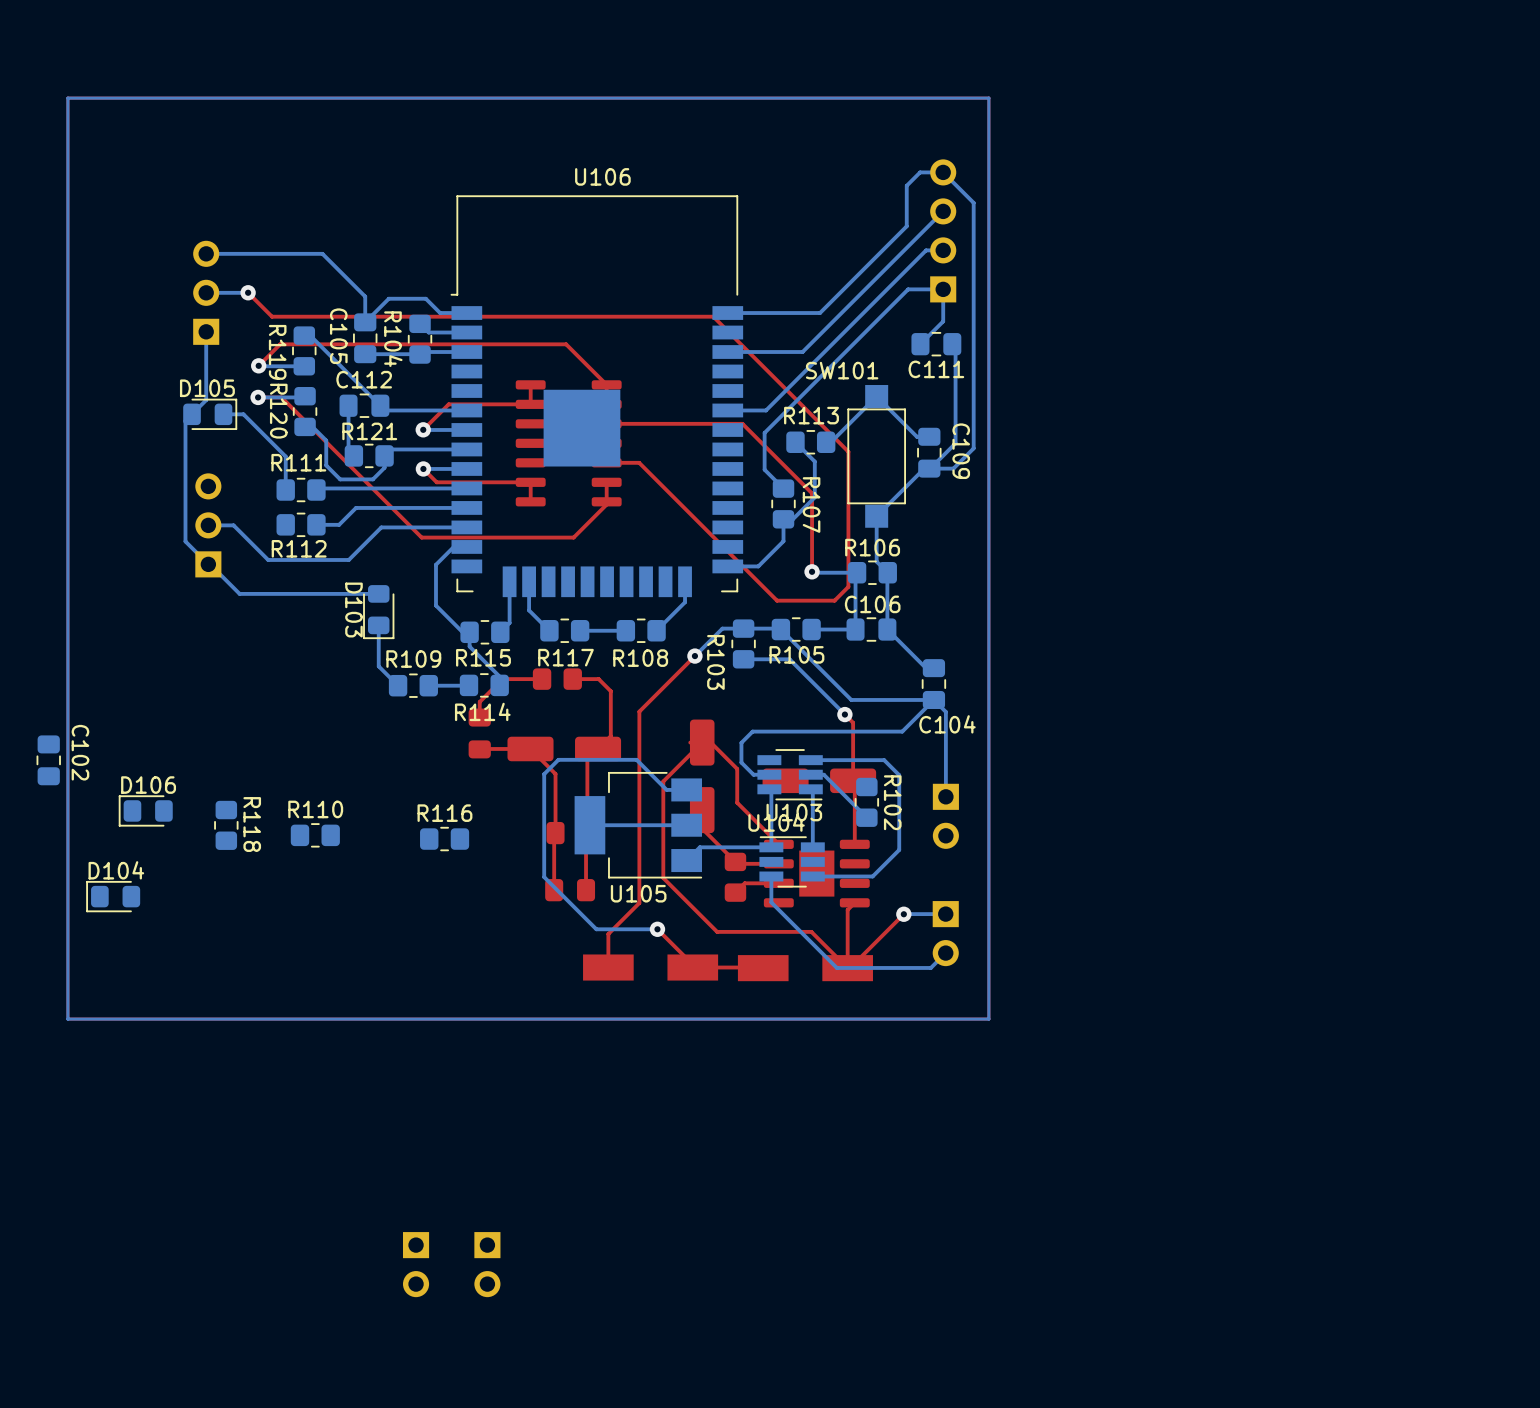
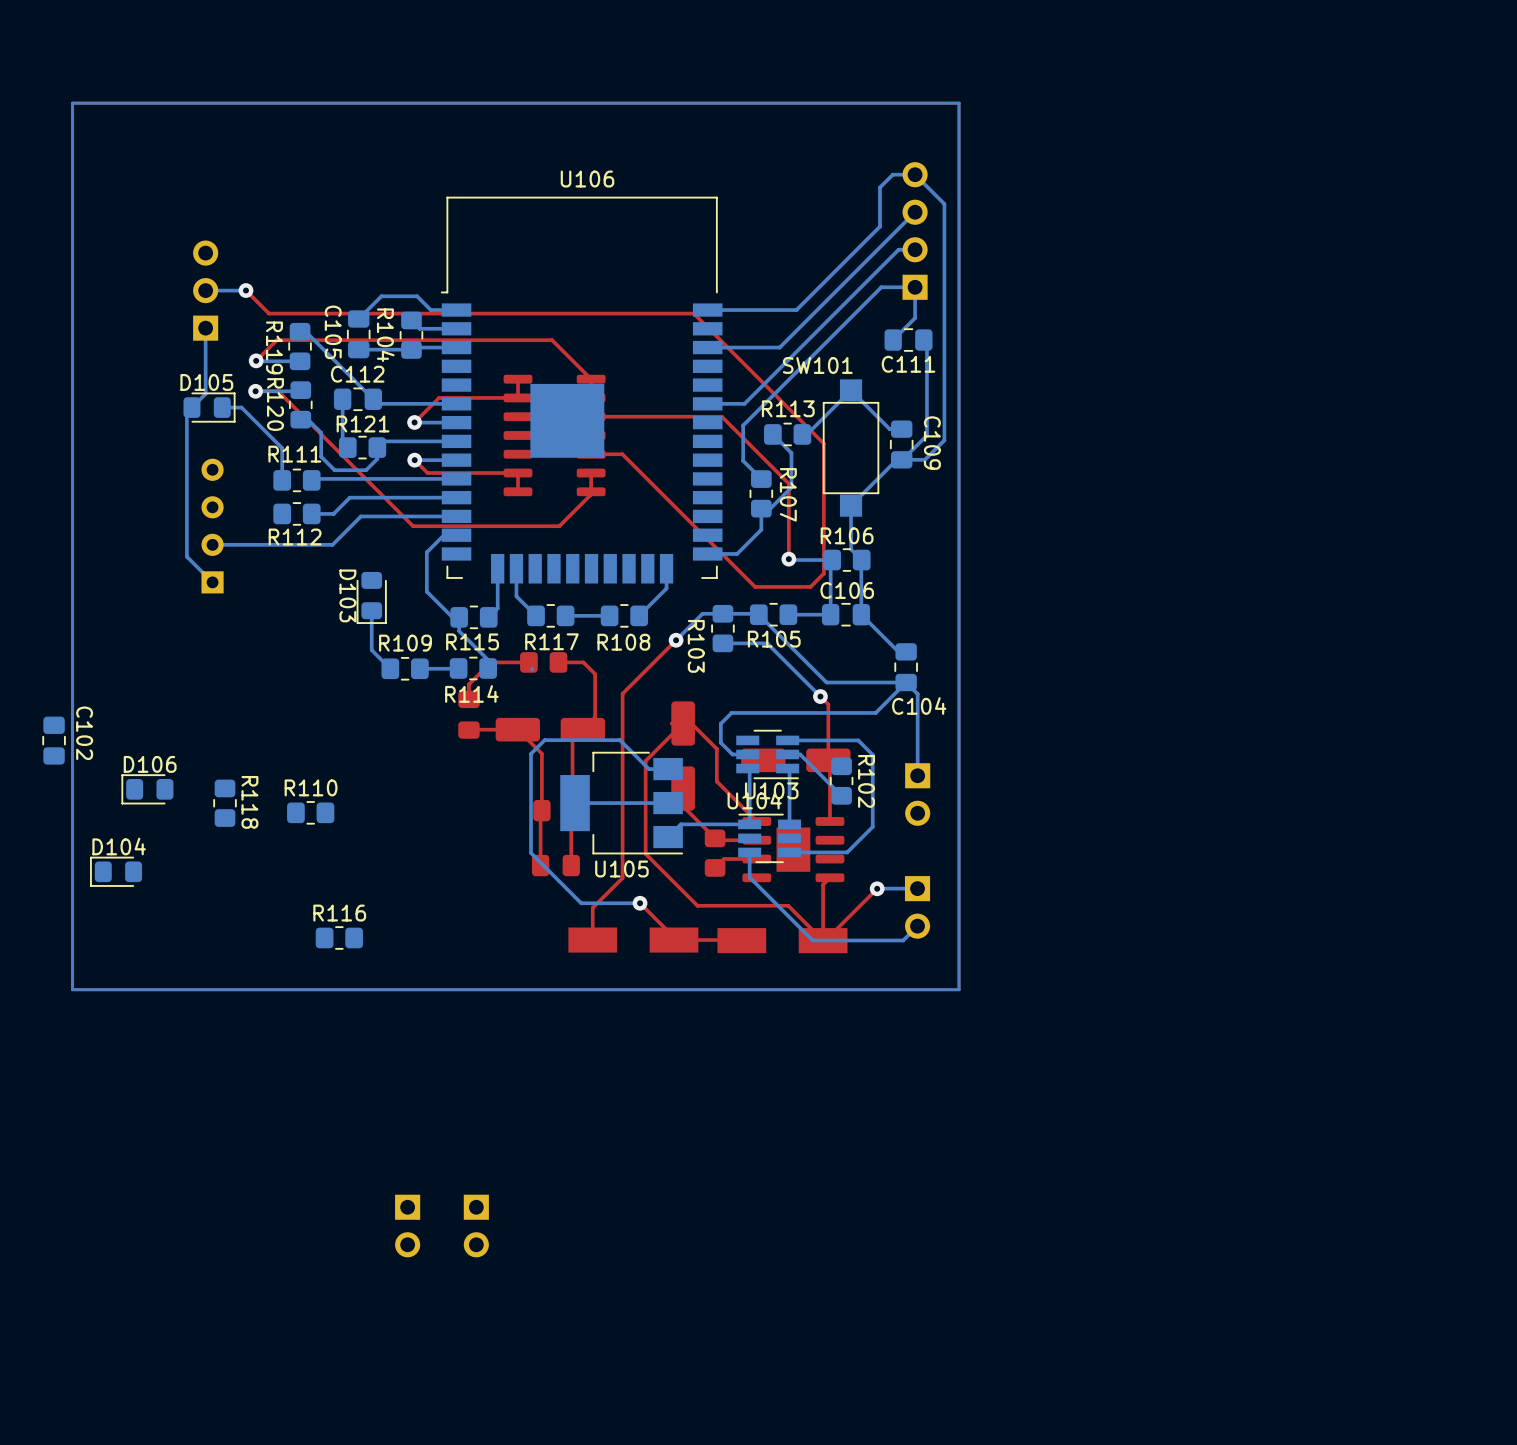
bottom track: (206, 253) (322, 253) (365, 296) (365, 322) -> none
bottom track: (186, 419) (185, 541) (239, 593) (378, 593) -> (186, 412) (186, 556) (212, 582)
part footprint: [195, 473, 222, 578] -> [201, 458, 224, 594]
bottom track: (208, 525) (233, 525) (268, 559) (348, 559) (381, 527) -> (212, 544) (332, 544) (360, 516) (374, 516)
bottom track: none -> (532, 669) (532, 669)
R116 position: (444, 839) -> (339, 937)

